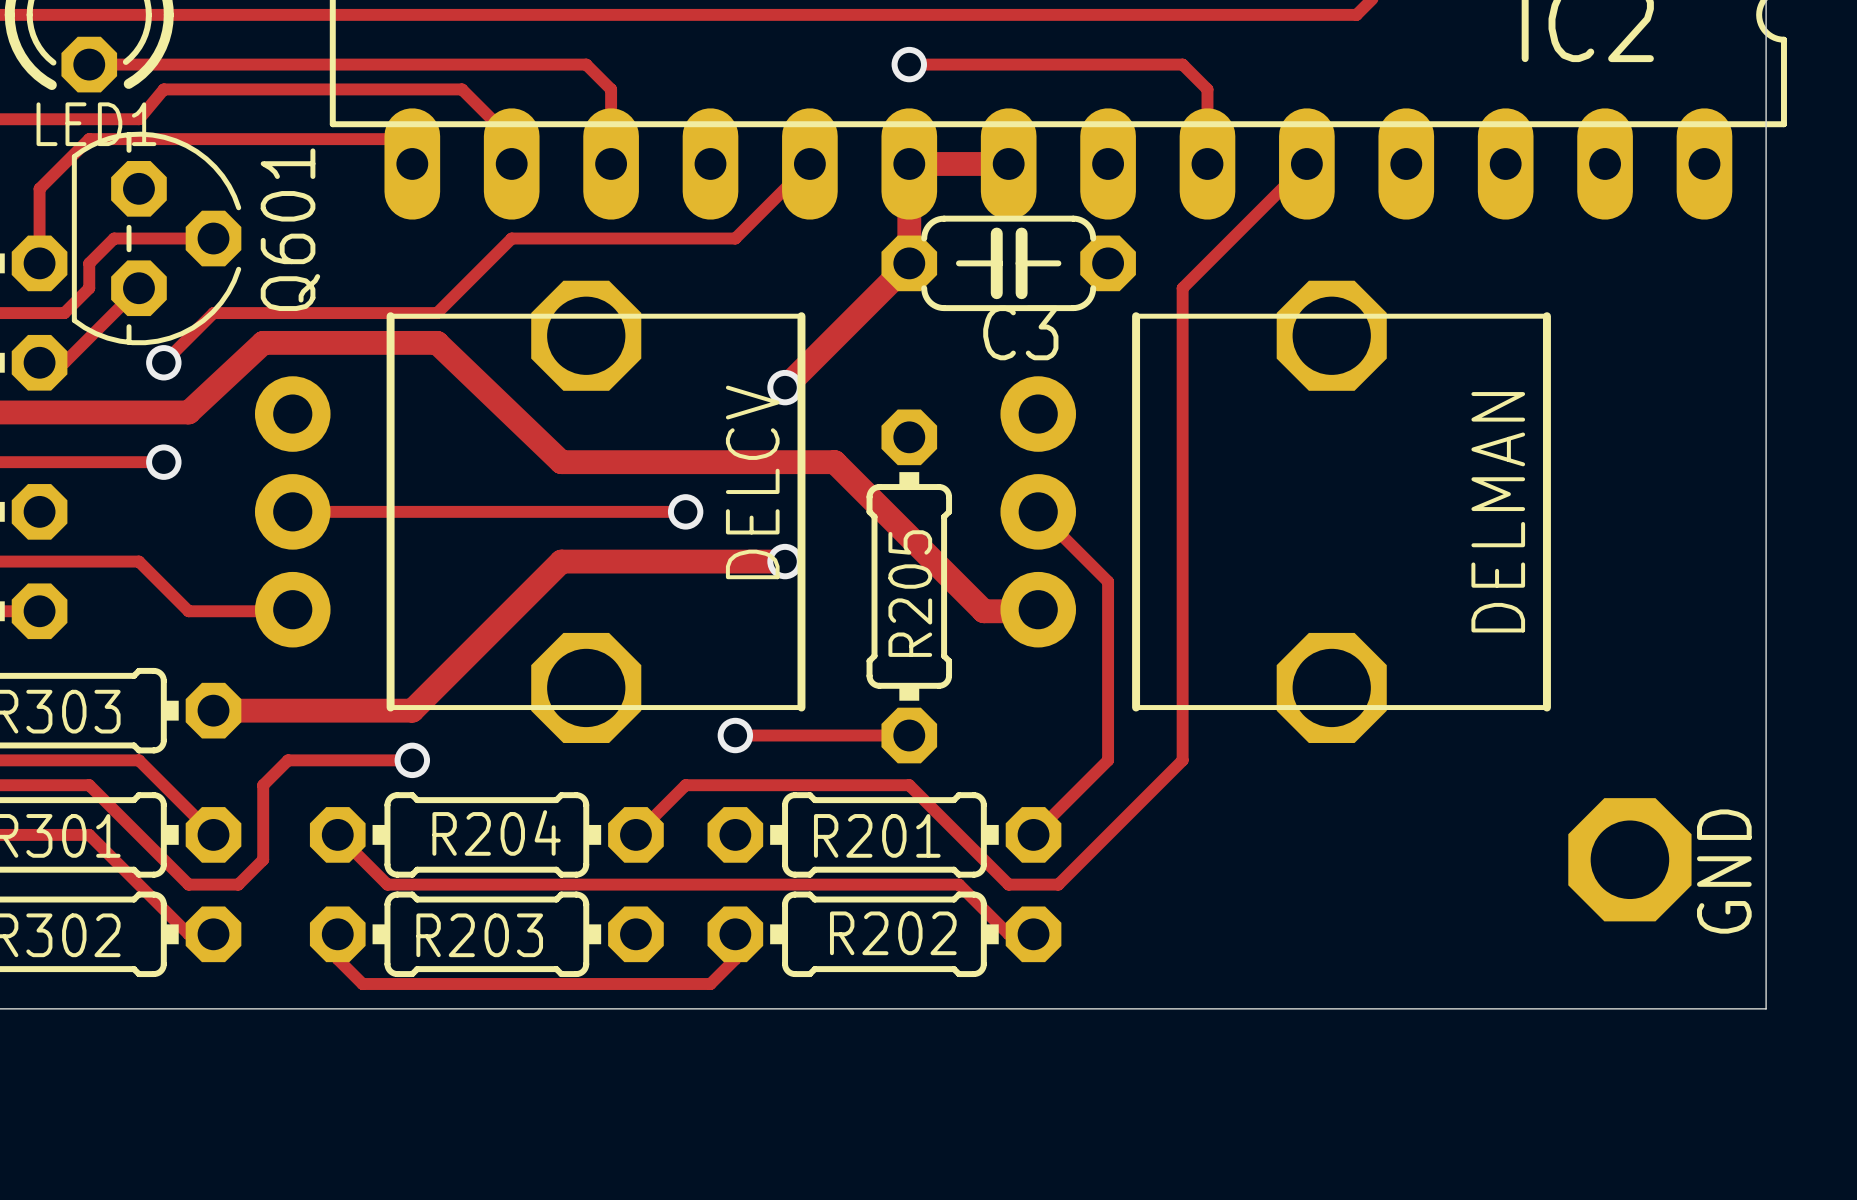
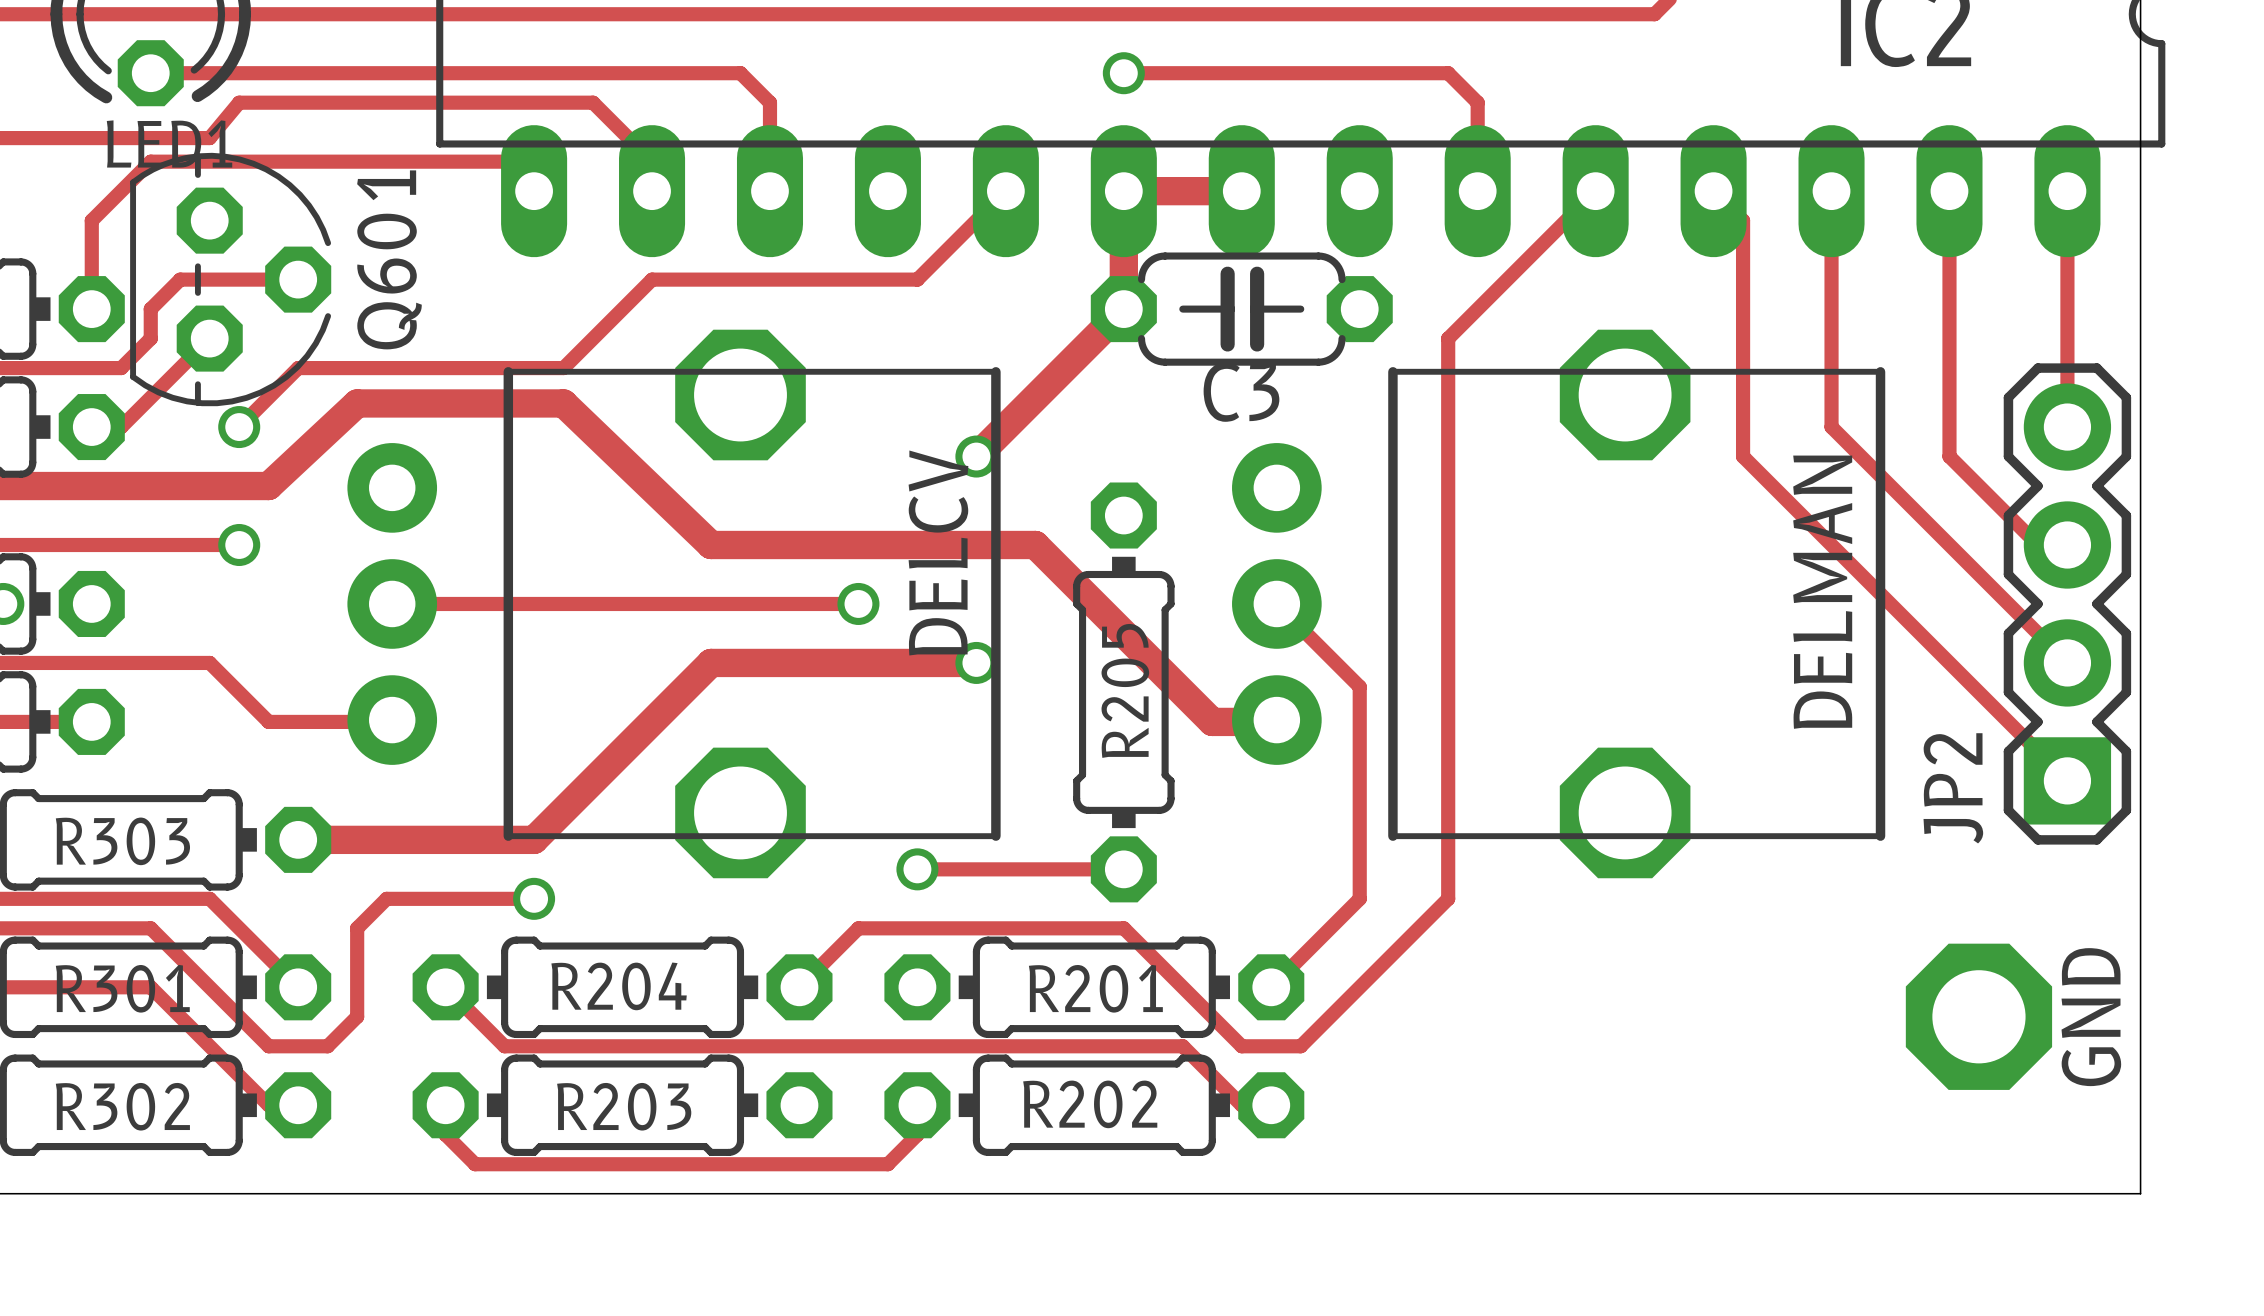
track: none -> (1713, 191) (1743, 220) (1743, 456) (2067, 780)
track: none -> (1831, 191) (1831, 427) (2067, 662)
track: none -> (1949, 191) (1949, 456) (2037, 545) (2067, 545)
track: none -> (2067, 191) (2067, 427)
JP2: none -> (2067, 603)

